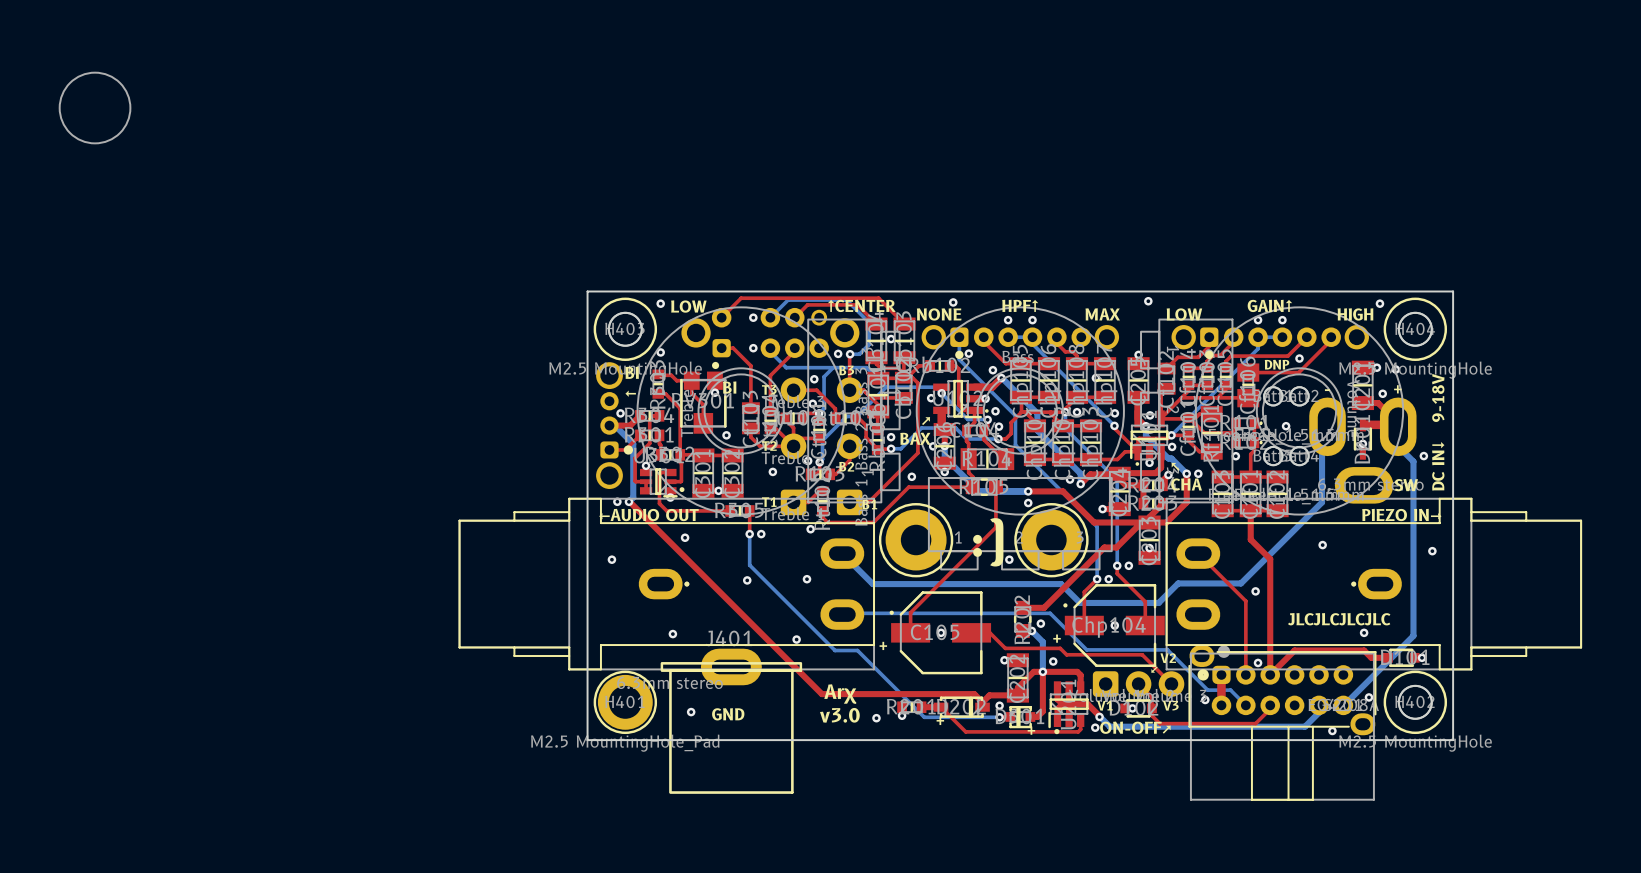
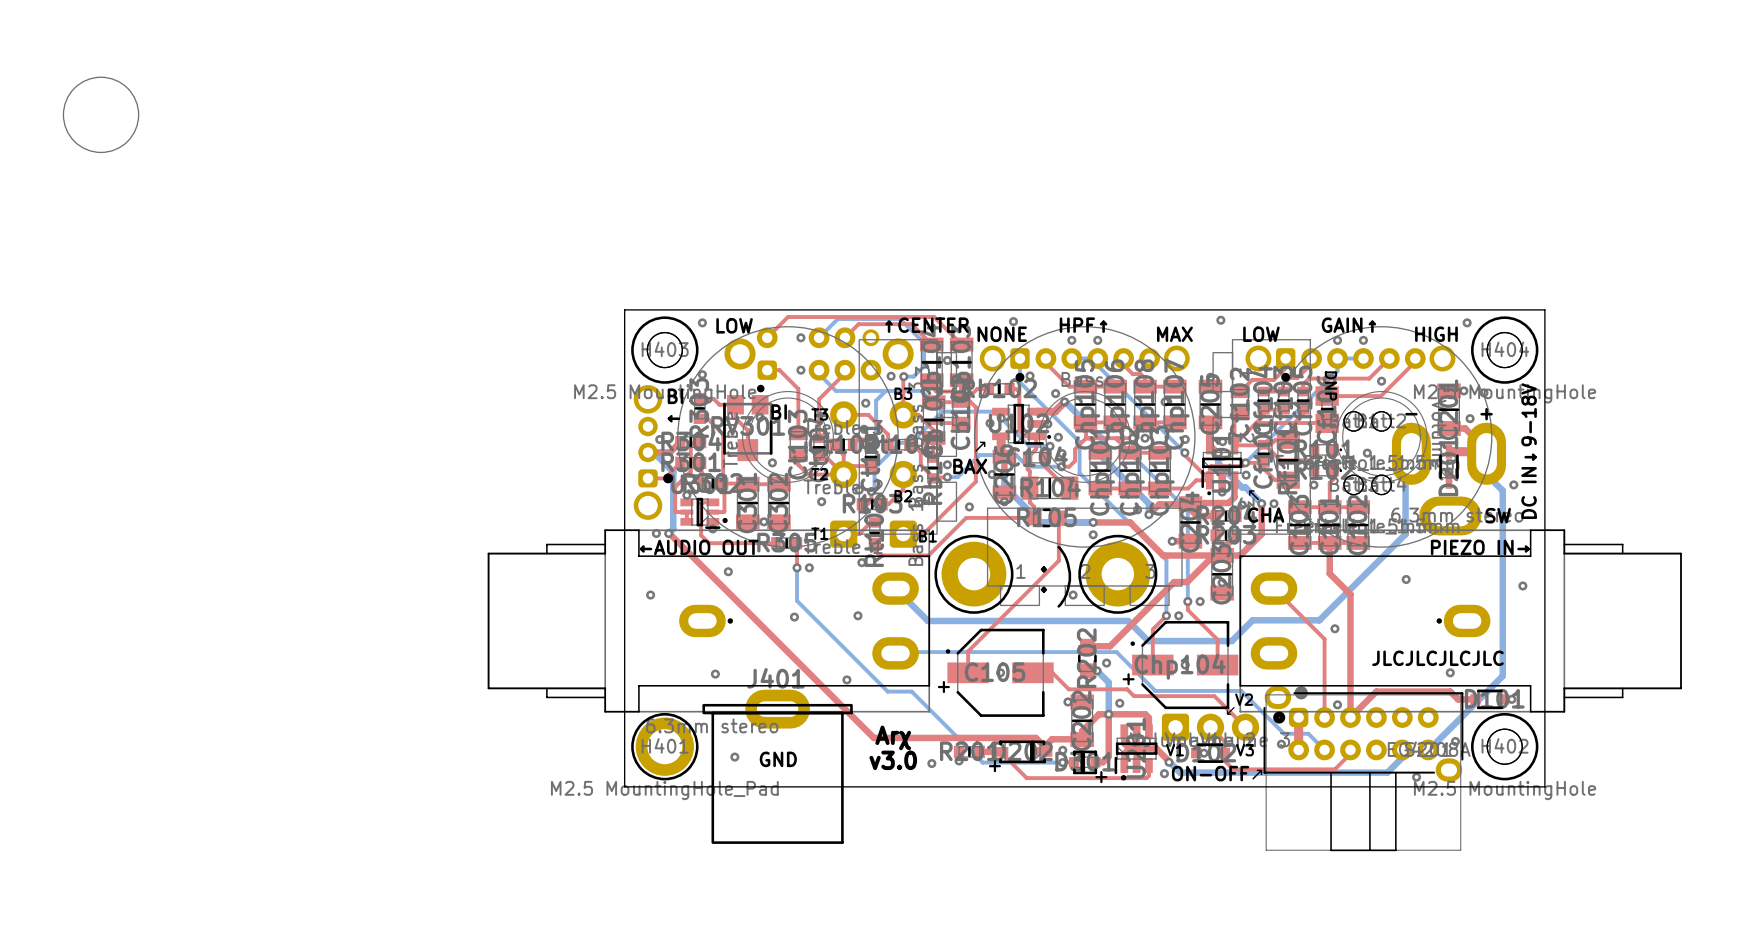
text rotation: 0° (1277, 364) -> 90° clockwise (1331, 385)

